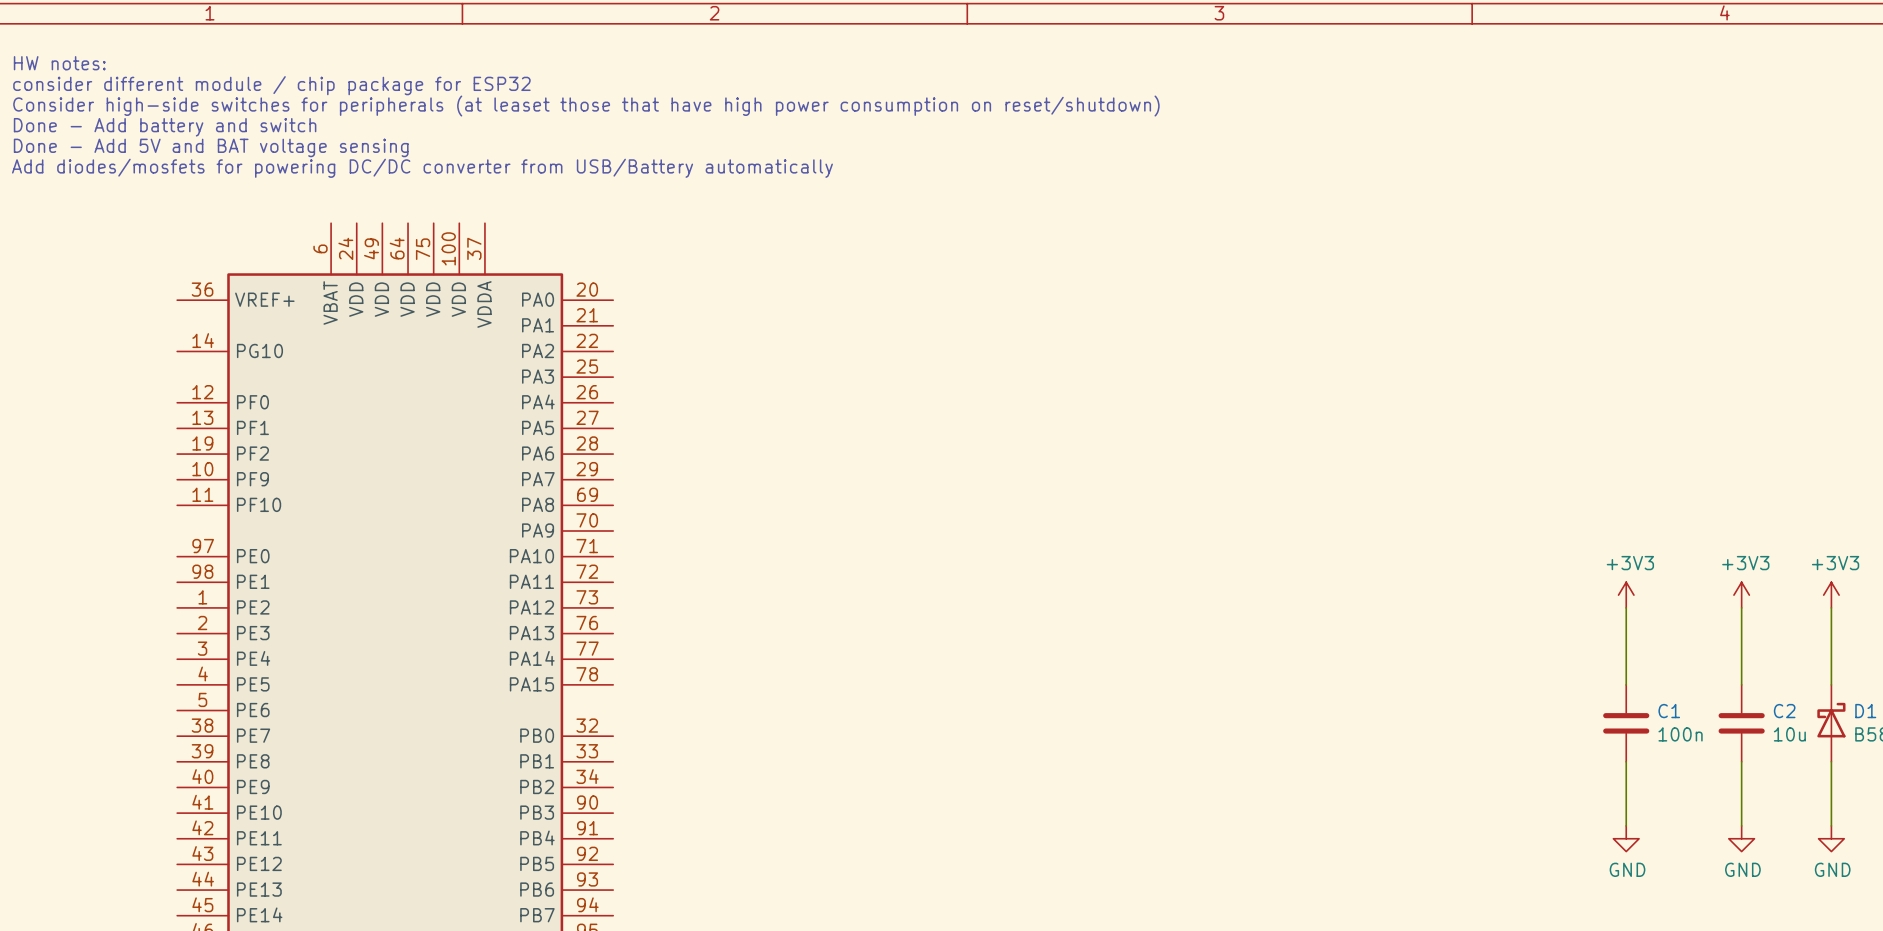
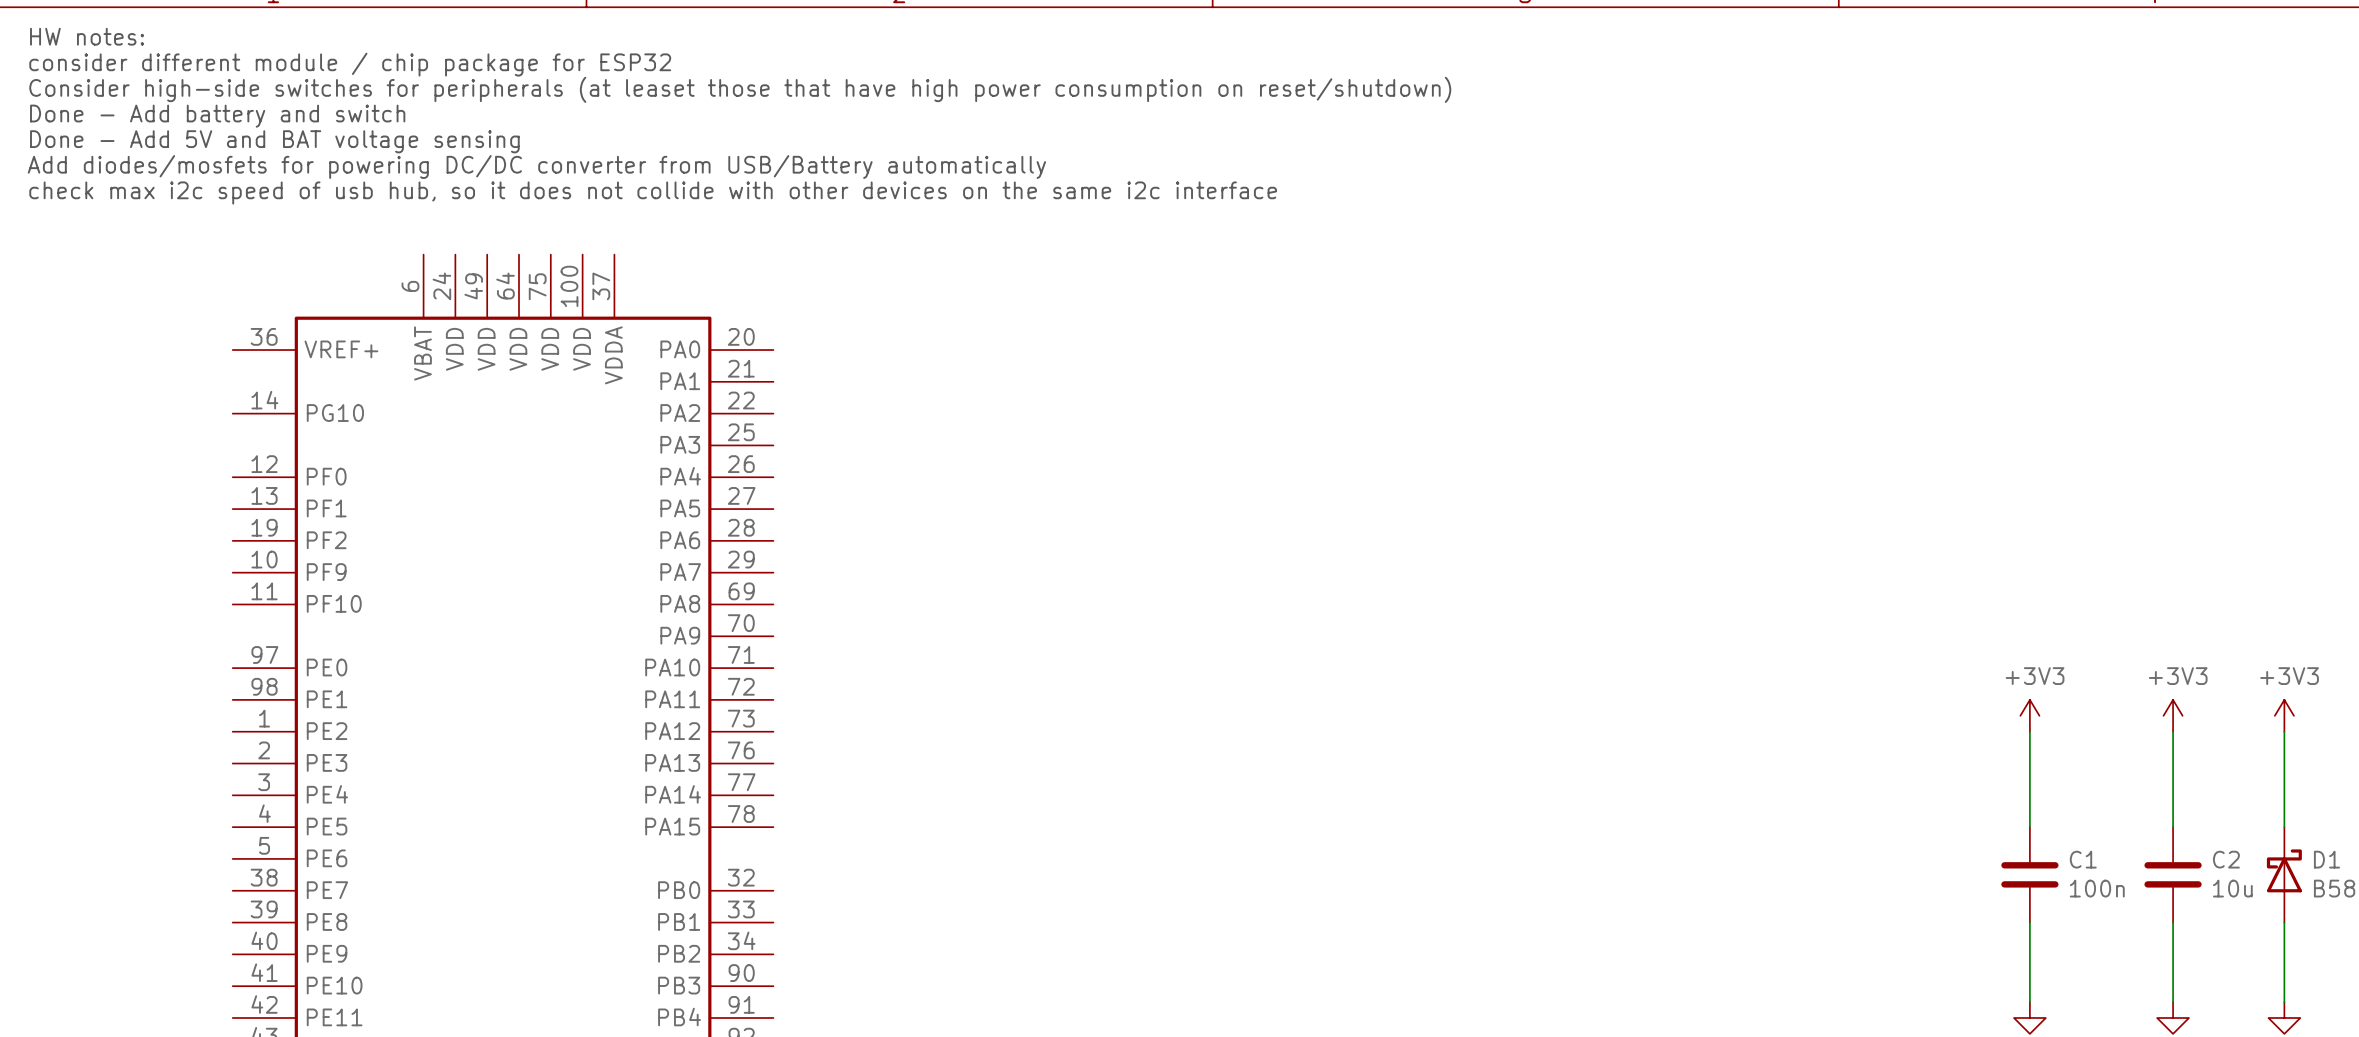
text position: HW notes: (59, 63) -> HW notes: (87, 36)
text position: consider different module / chip package for ESP32 (271, 85) -> consider different module / chip package for ESP32 (350, 64)
text position: Consider high-side switches for peripherals (at leaset those that have high power consumption on reset/shutdown) (586, 106) -> Consider high-side switches for peripherals (at leaset those that have high power consumption on reset/shutdown) (740, 89)
text position: Done - Add battery and switch (165, 127) -> Done - Add battery and switch (217, 116)
text position: Done - Add 5V and BAT voltage sensing (211, 147) -> Done - Add 5V and BAT voltage sensing (274, 141)
text position: Add diodes/mosfets for powering DC/DC converter from USB/Battery automatically (422, 168) -> Add diodes/mosfets for powering DC/DC converter from USB/Battery automatically (536, 167)
text: none -> check max i2c speed of usb hub, so it does not collide with other devices on the same i2c interface (653, 192)

